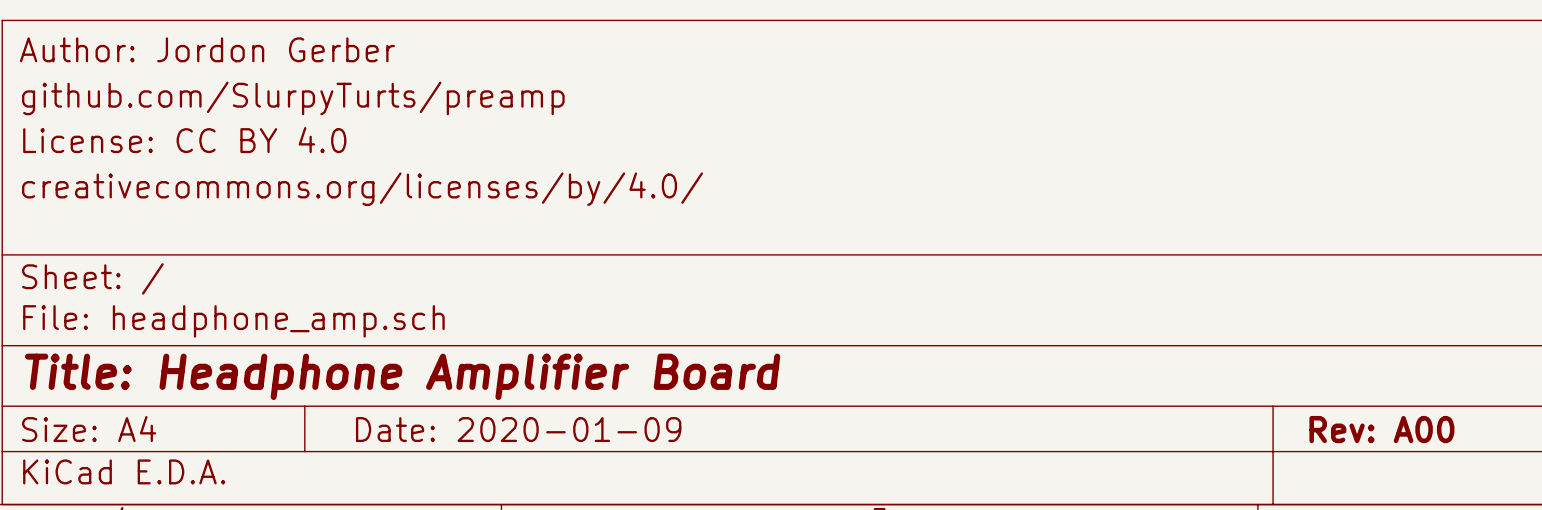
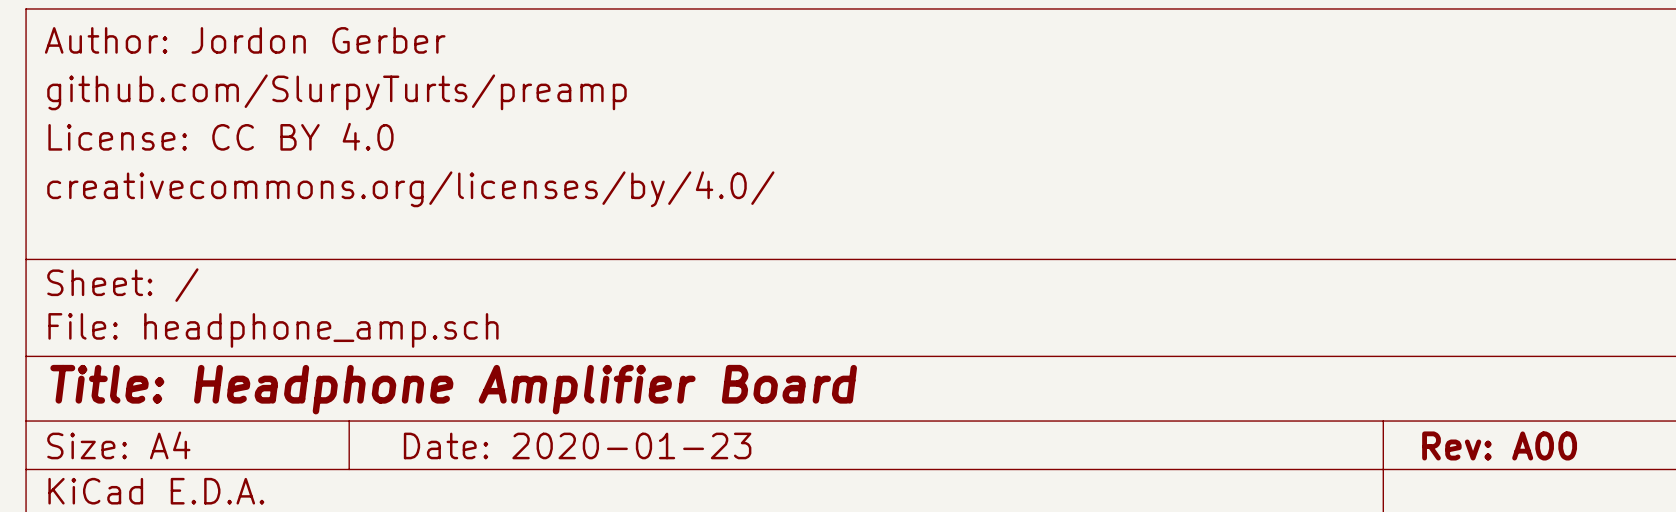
title block: Date: 2020-01-09 (518, 429) -> Date: 2020-01-23 (577, 445)

